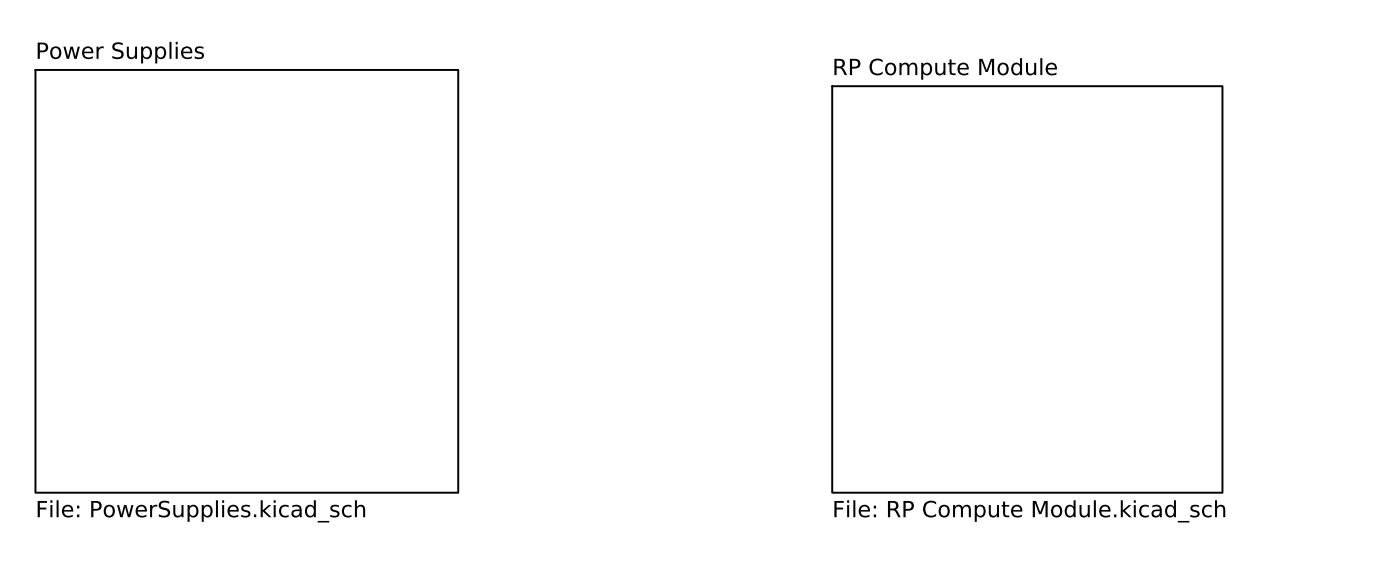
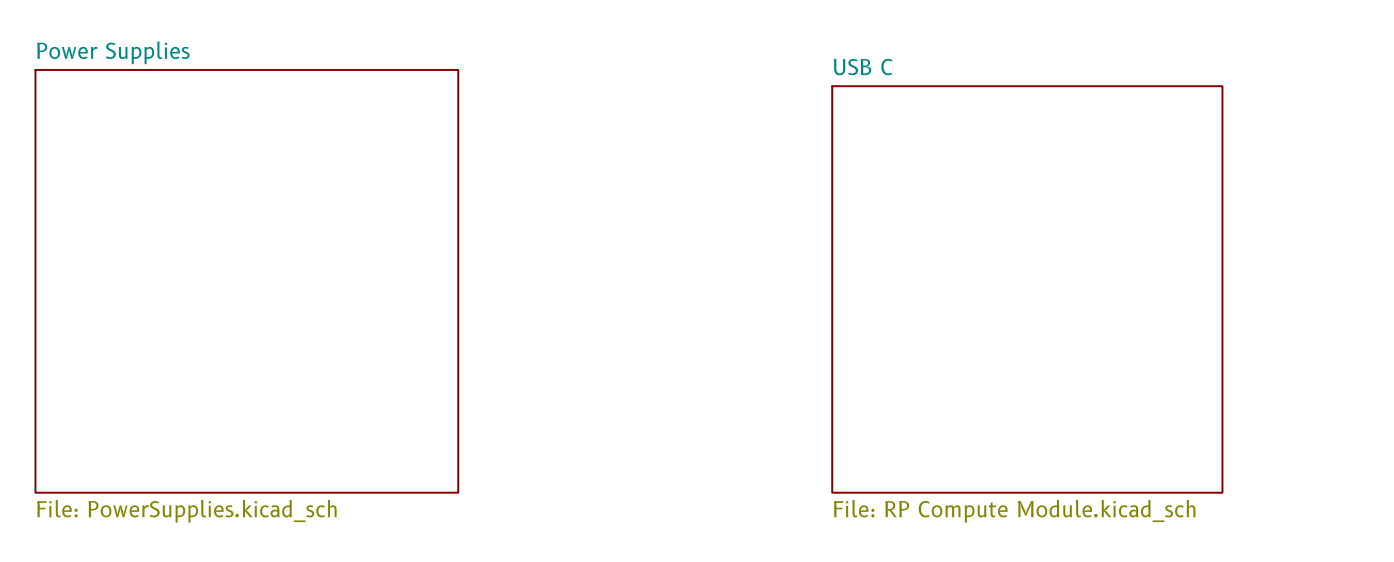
sheet RP Compute Module name: RP Compute Module (945, 68) -> USB C (863, 67)

